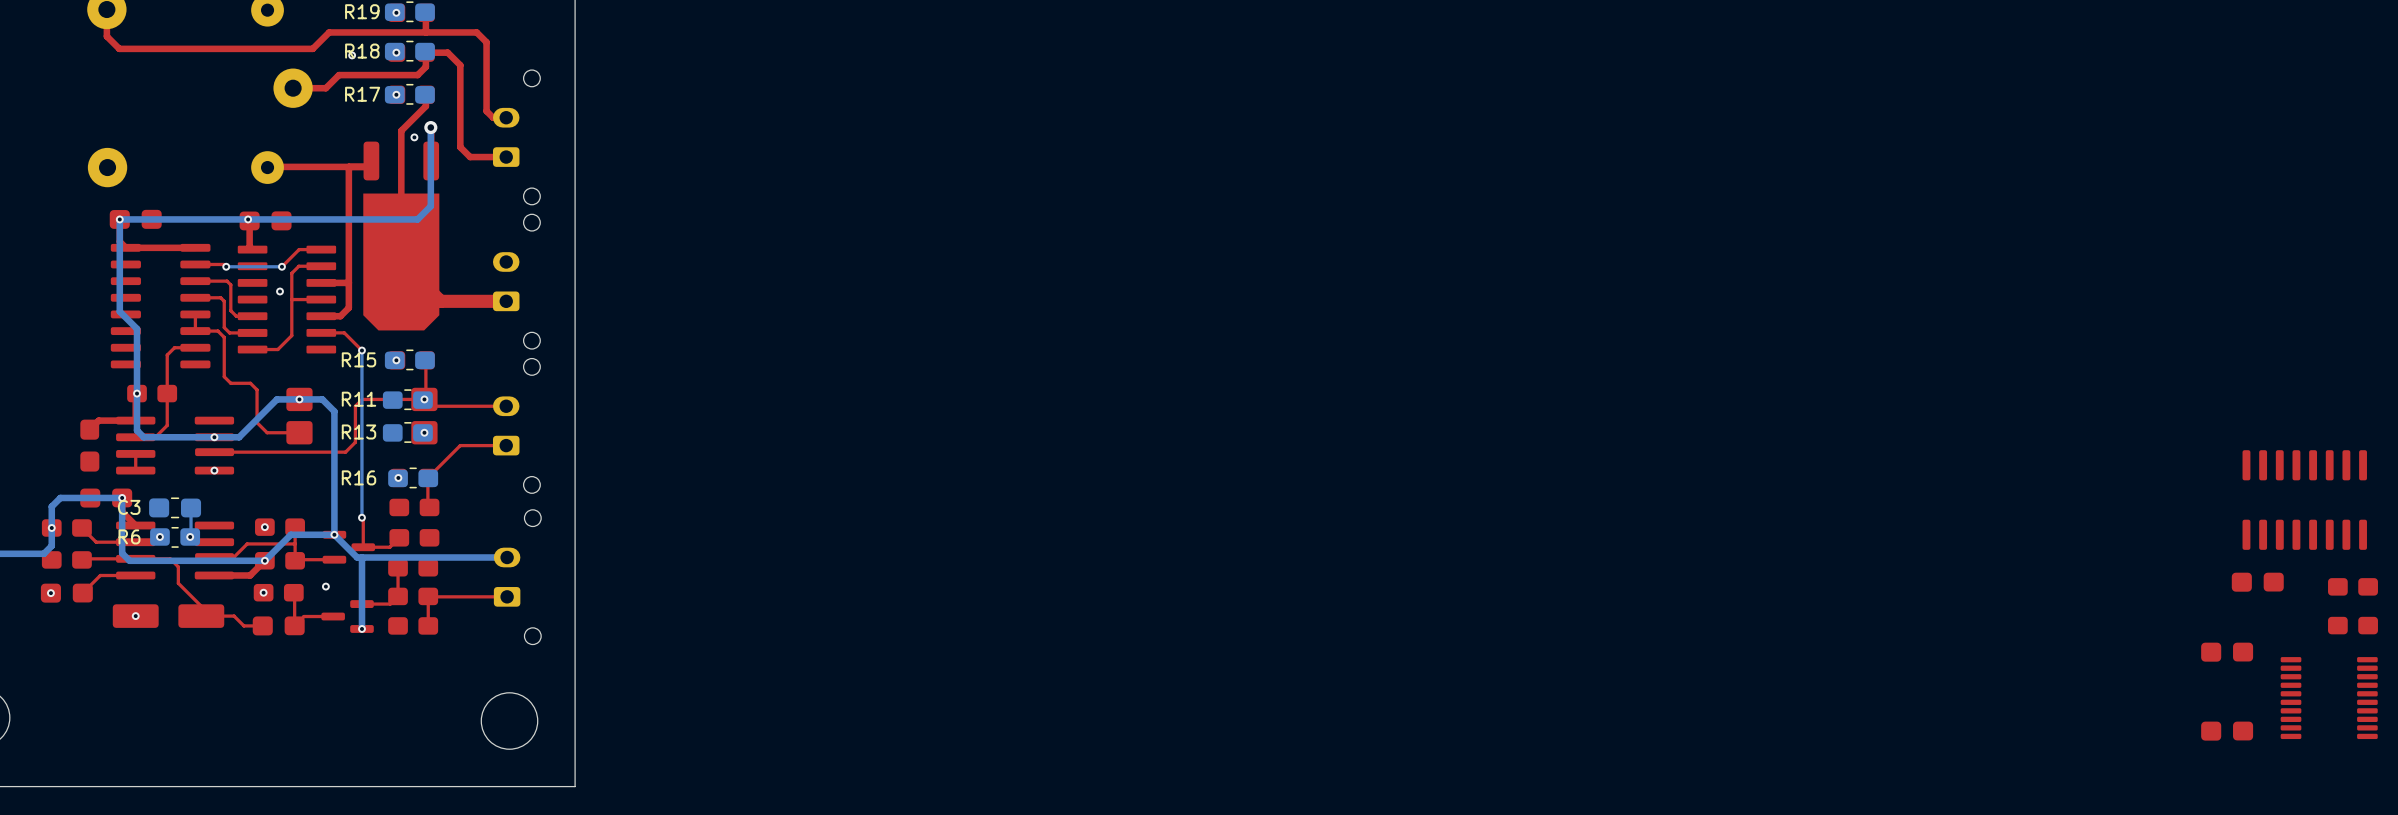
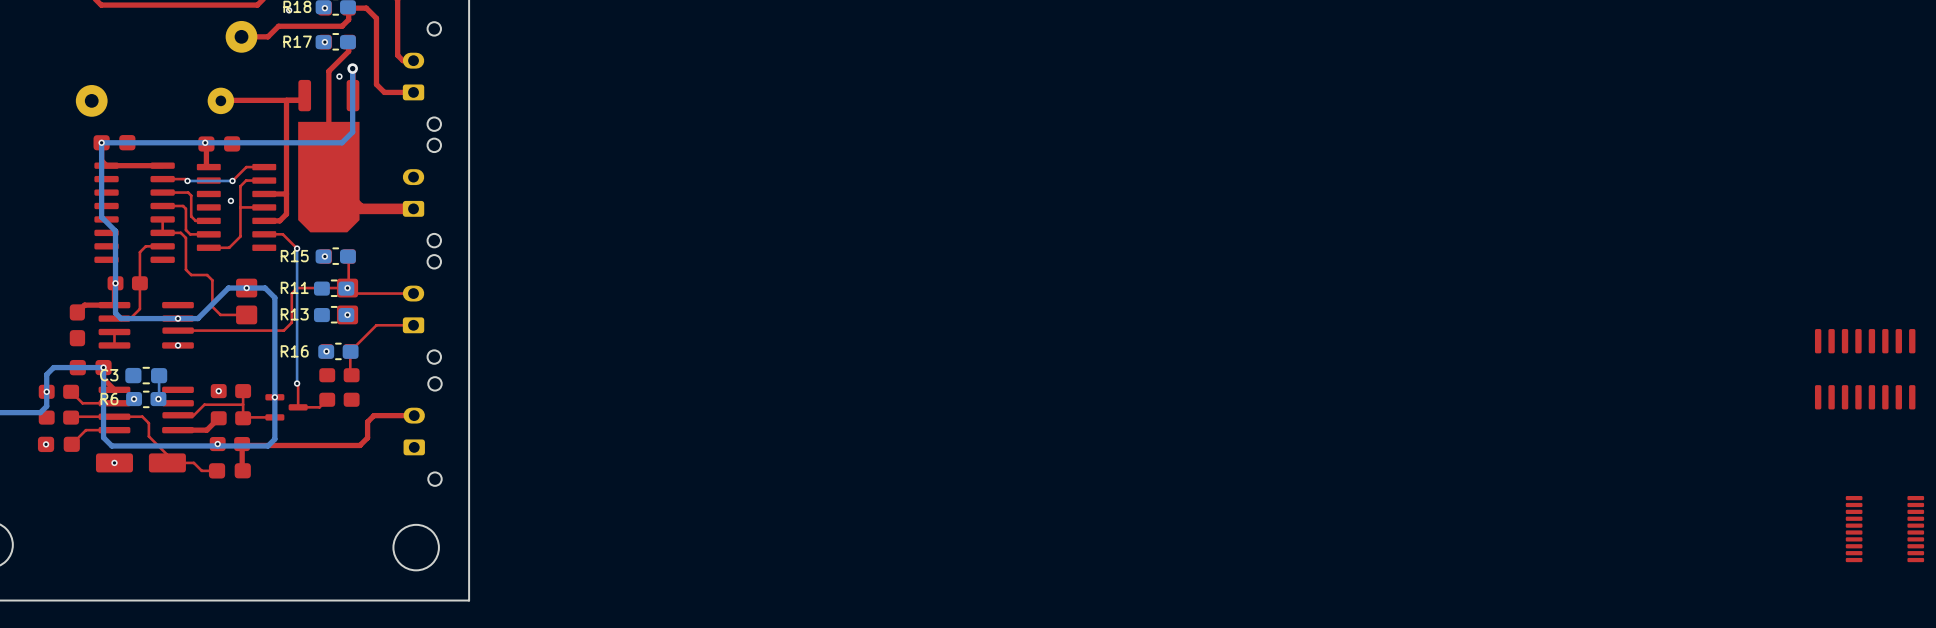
bottom track: (122, 553) (129, 560) (264, 560) (290, 534) (334, 534) (357, 557) (507, 557) -> (103, 412) (103, 437) (111, 445) (268, 445) (274, 439) (274, 397)
bottom track: (362, 557) (362, 628) -> none
top track: none -> (414, 415) (373, 415) (367, 422) (367, 437) (359, 445) (242, 445) (242, 470)
via: (264, 560) -> none
top track: (398, 567) (398, 596) (390, 604) (362, 604) -> none
part: (413, 567) -> none
part: (2257, 582) -> none
via: (325, 586) -> none
part: (2352, 586) -> none
top track: (293, 592) (294, 625) (303, 616) (333, 616) -> none
part: (413, 596) -> none
top track: (507, 596) (428, 596) (428, 625) -> none
part: (347, 616) -> none
part: (413, 625) -> none
part: (2352, 625) -> none
via: (362, 628) -> none
part: (2227, 652) -> none
part: (2227, 731) -> none

